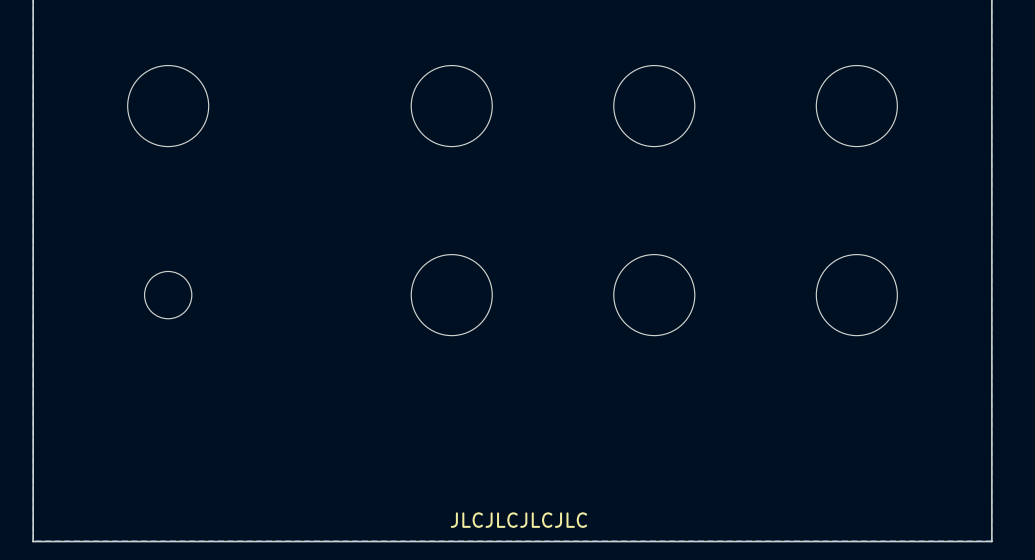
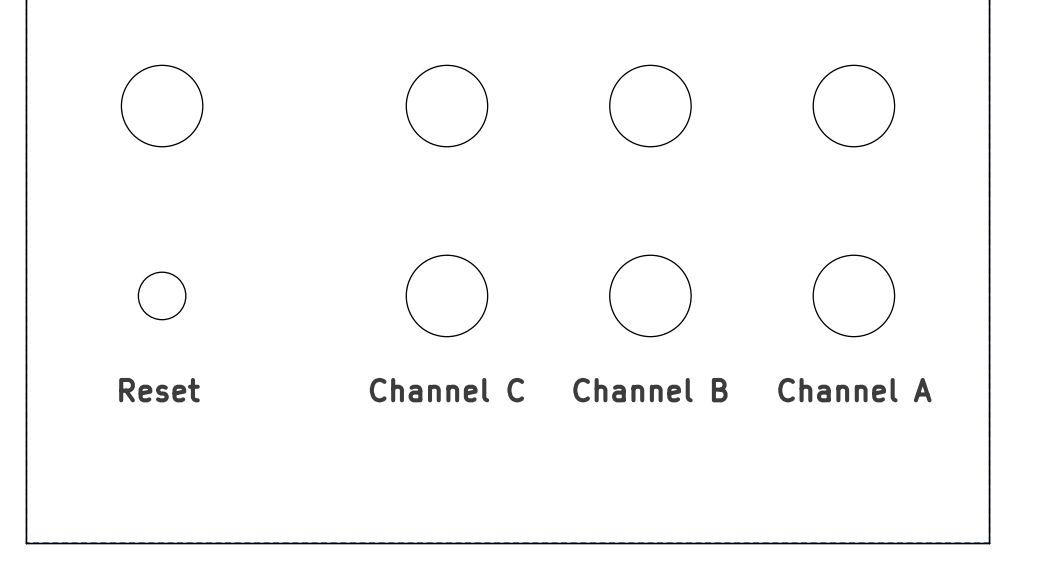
text: none -> Reset (159, 390)
text: none -> Channel C (446, 390)
text: none -> Channel B (650, 390)
text: none -> Channel A (854, 390)
text: JLCJLCJLCJLC (518, 520) -> none

